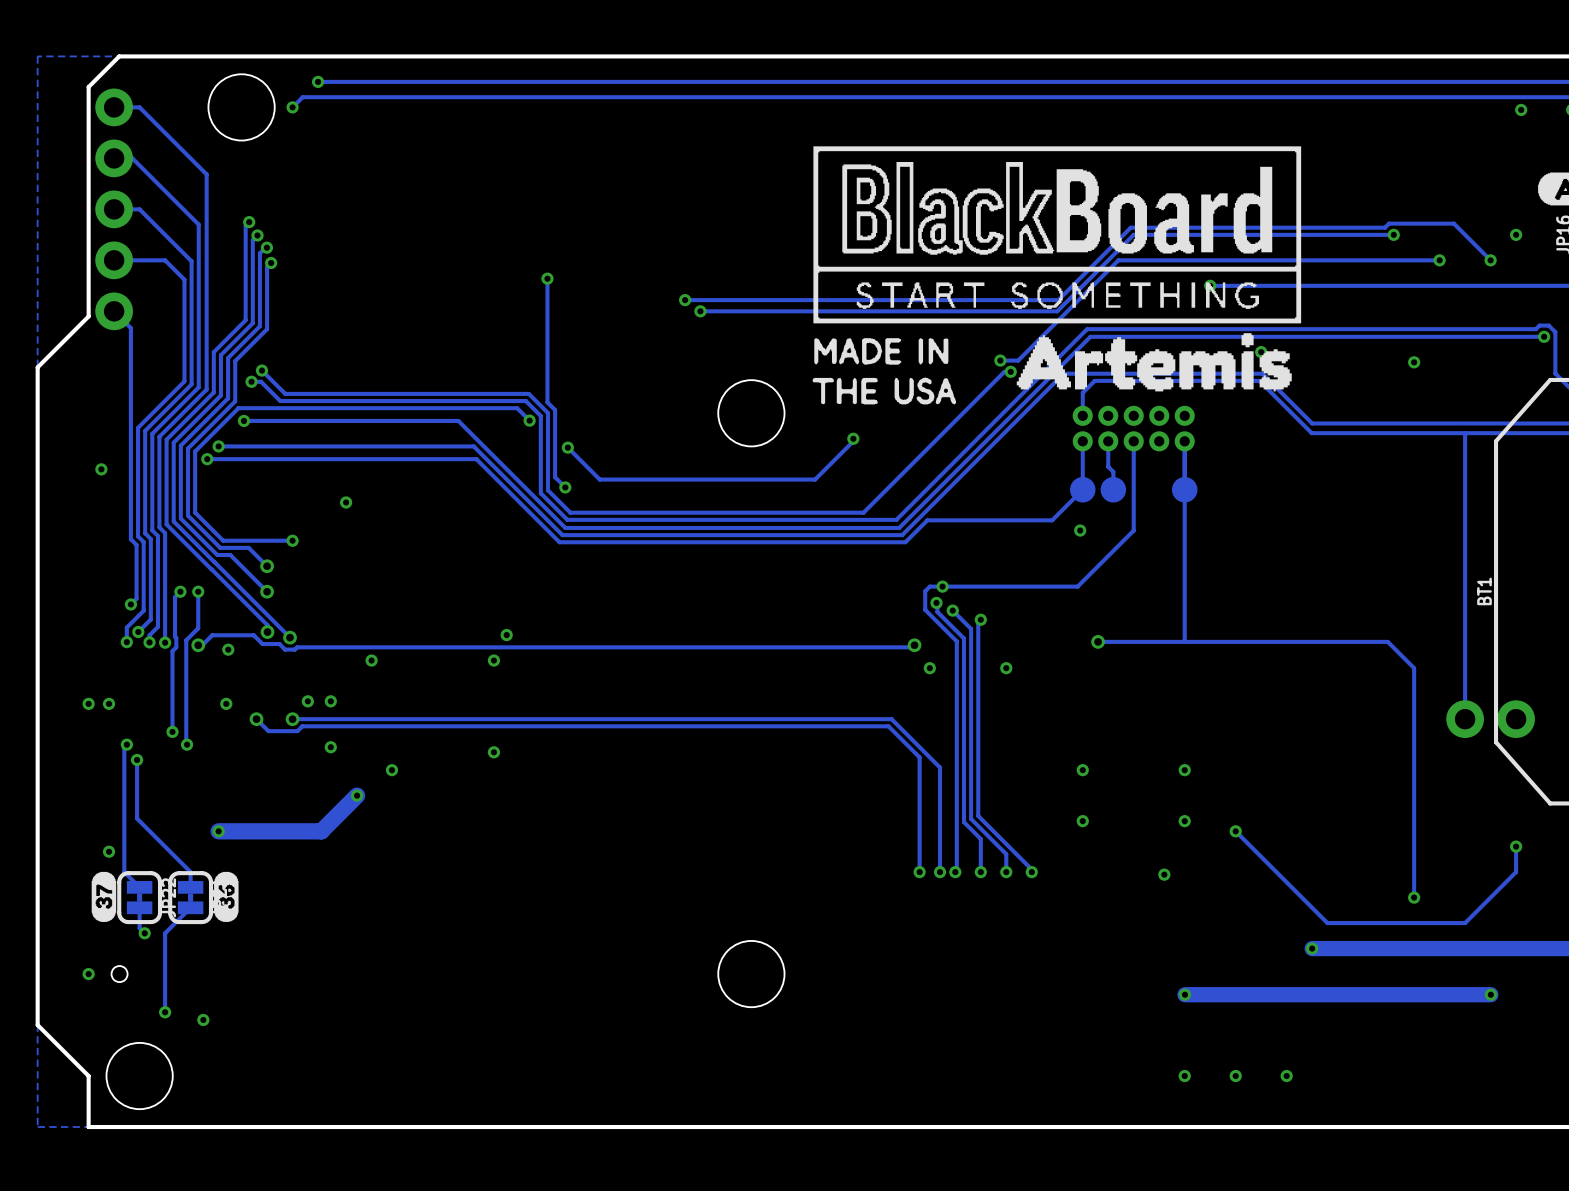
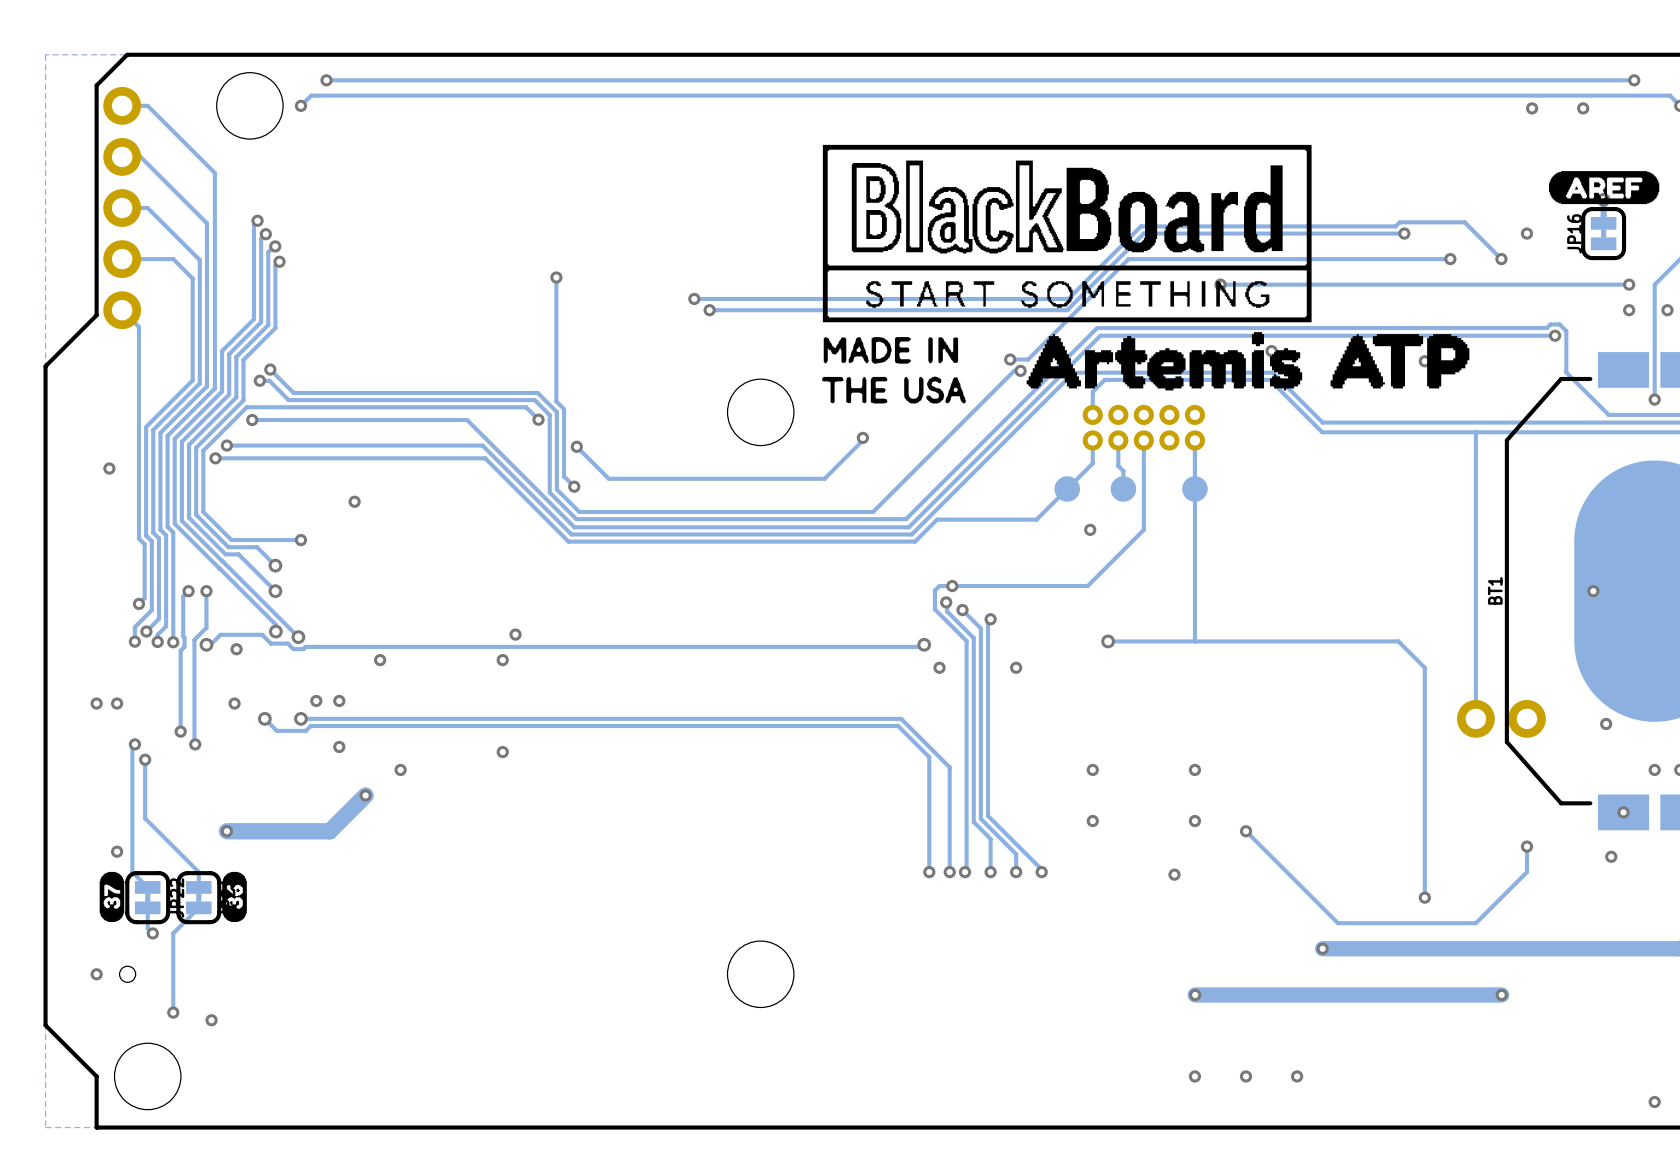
drawing: none -> [1330, 334, 1470, 389]
track: (1082, 464) (1082, 489) (1052, 520) (1026, 520) -> (1092, 463) (1036, 519)
part position: (1082, 489) -> (1067, 488)

